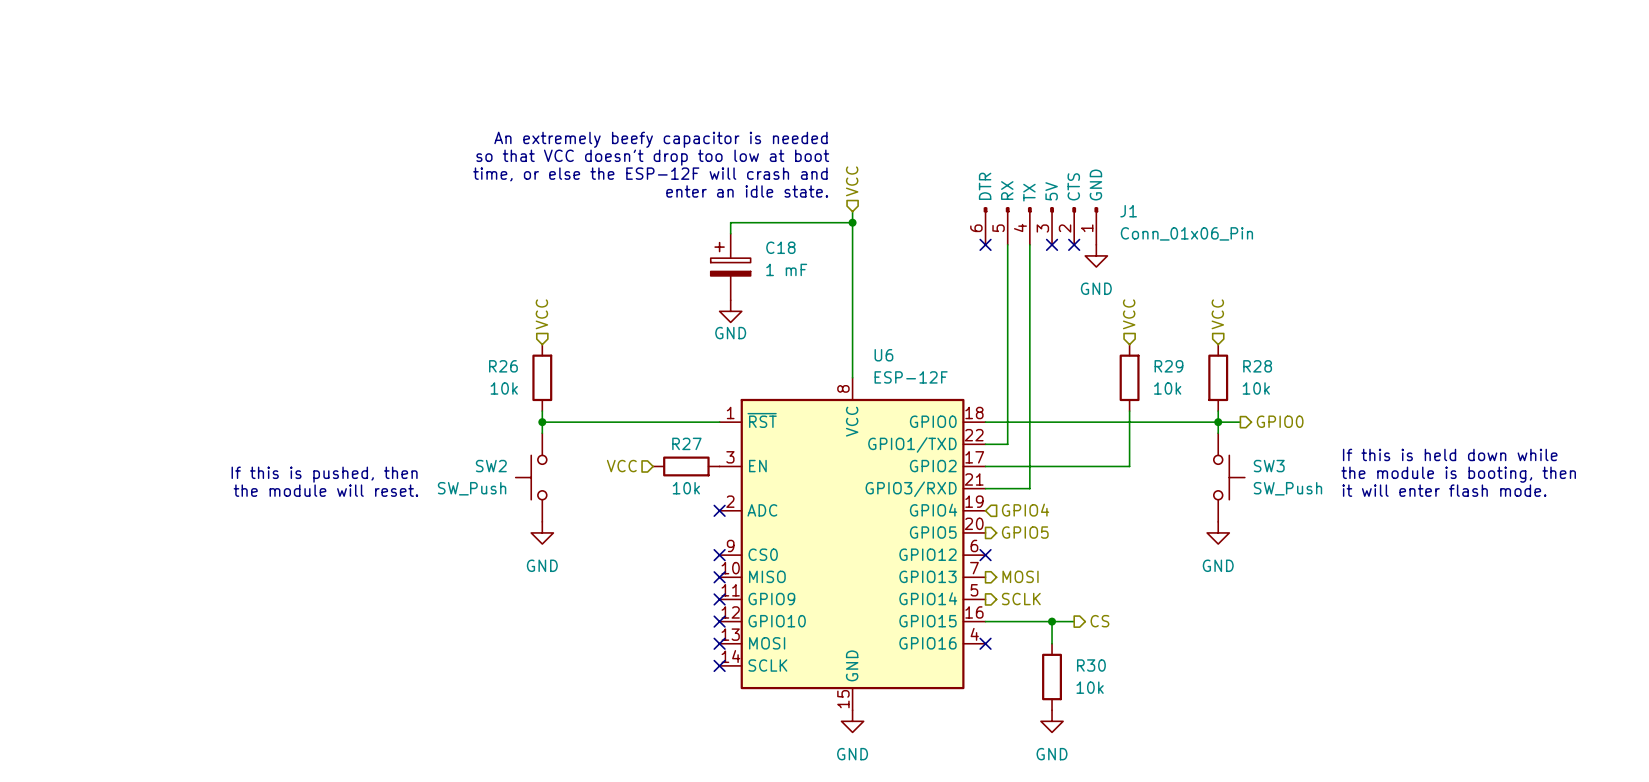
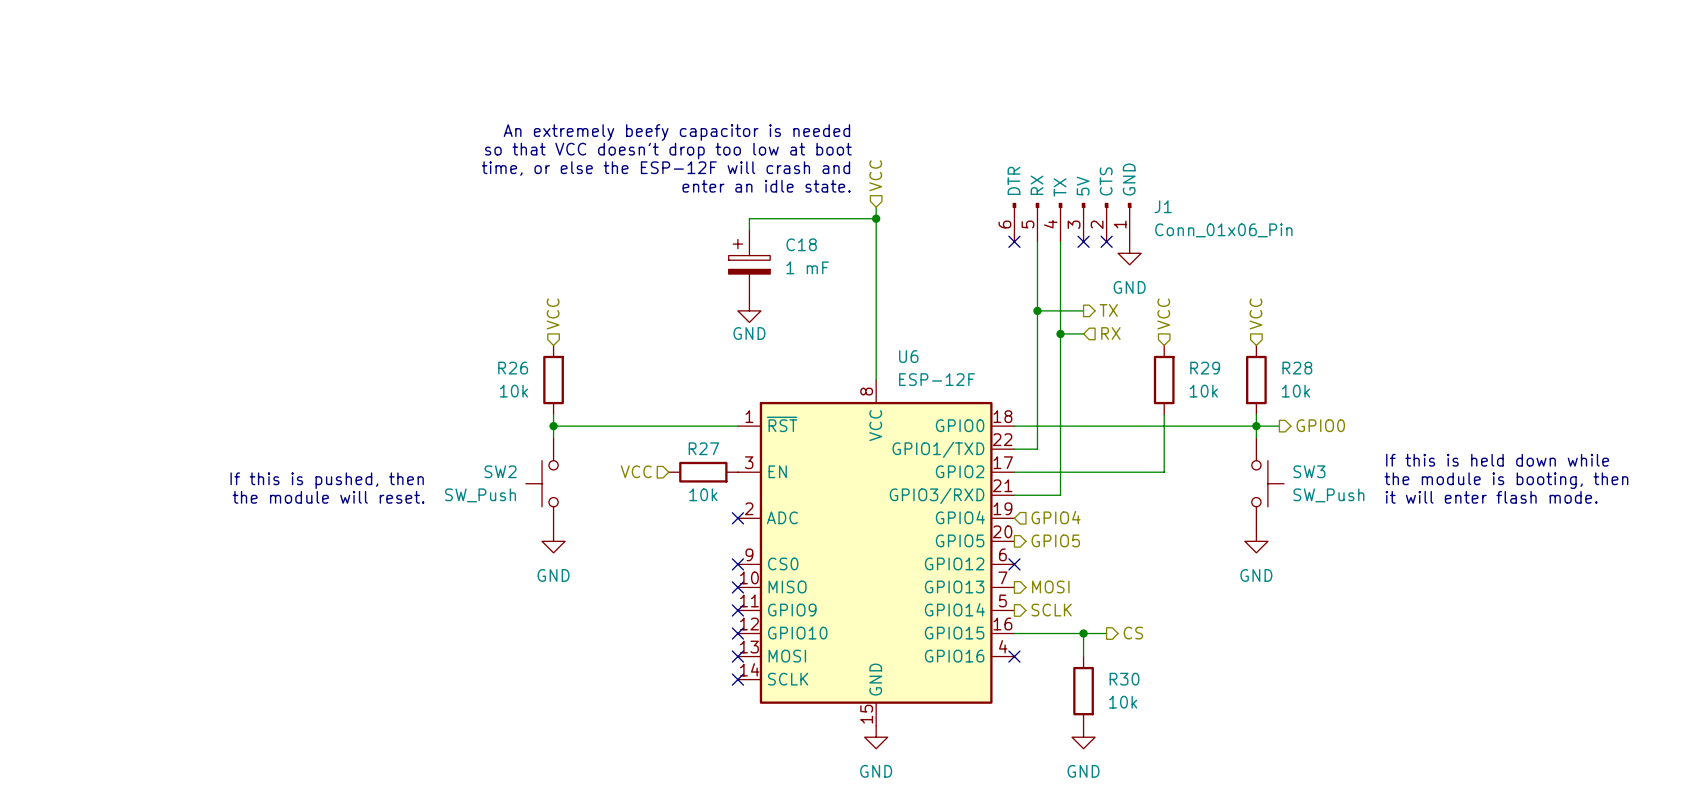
hierarchical label: none -> TX (1108, 310)
wire: none -> (1037, 310) (1083, 310)
junction: none -> (1037, 310)
wire: none -> (1060, 333) (1083, 333)
junction: none -> (1060, 333)
hierarchical label: none -> RX (1110, 333)

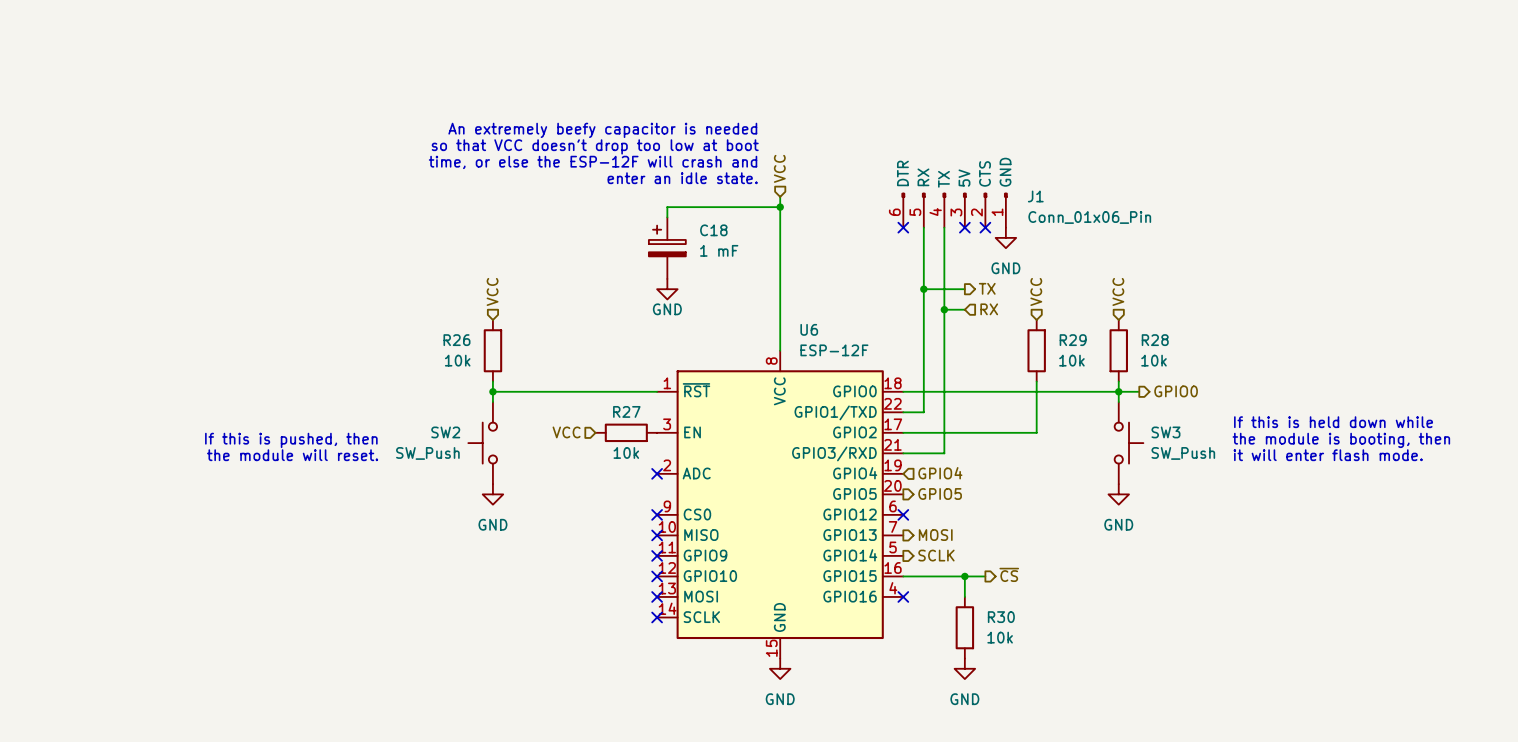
hierarchical label: CS (1133, 633) -> ~{CS} (1009, 574)

